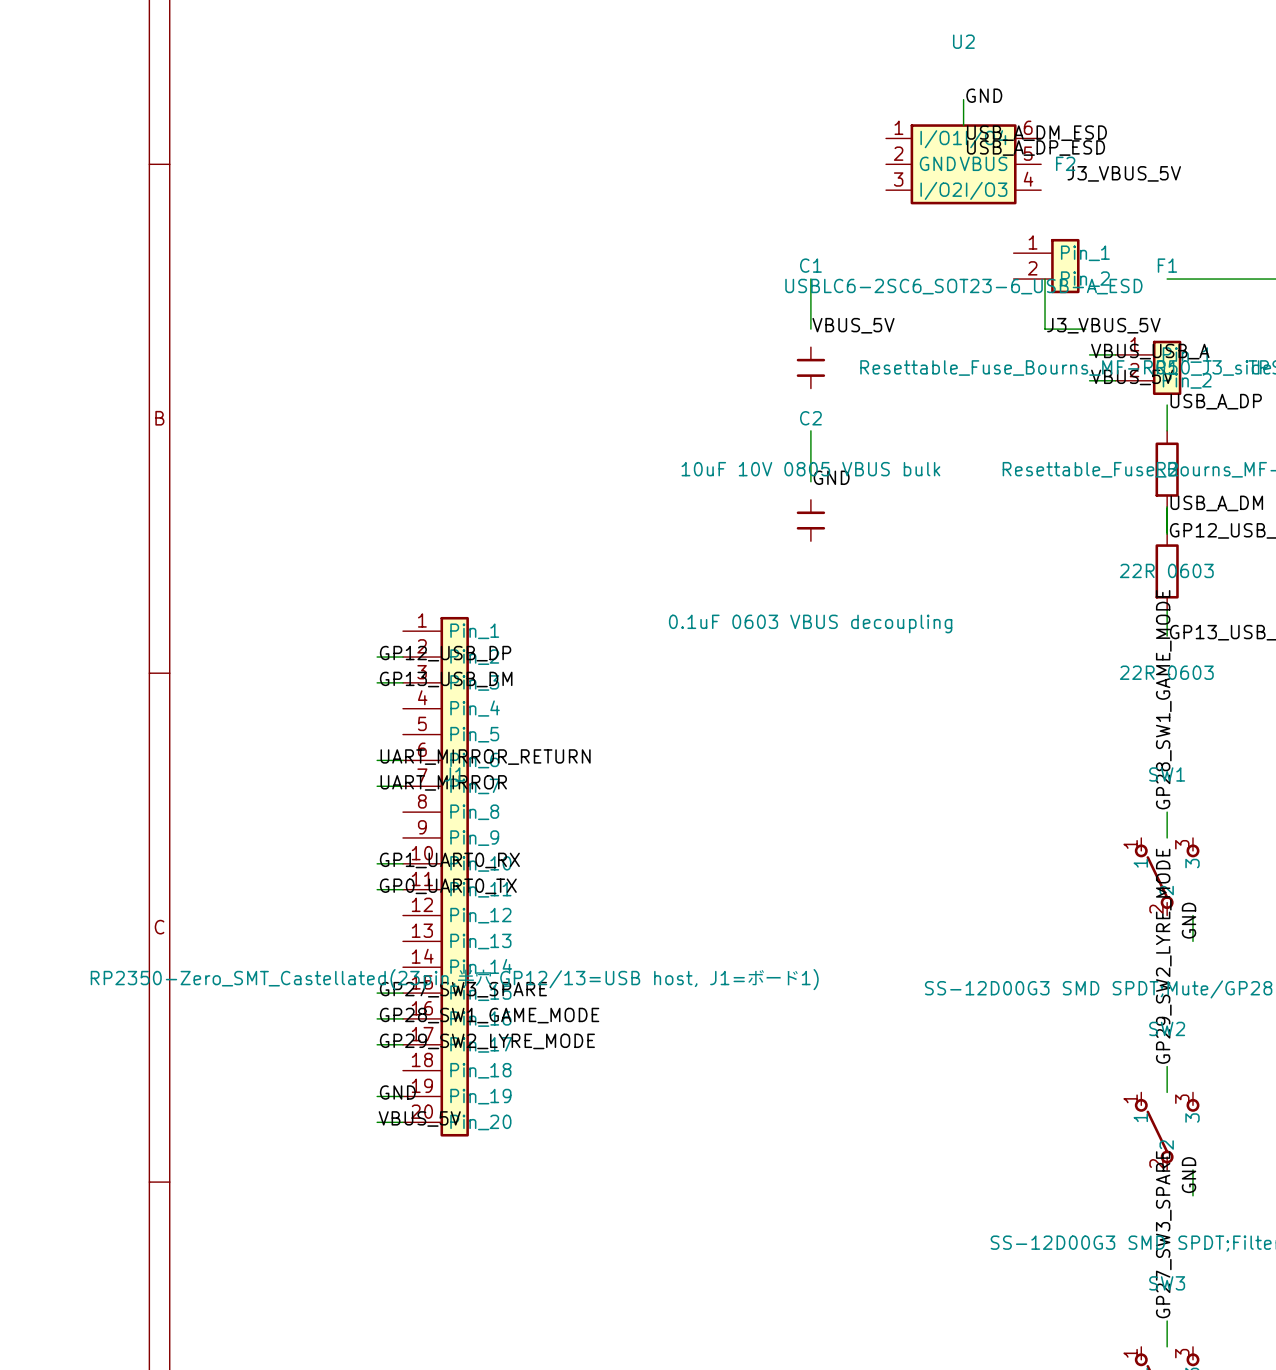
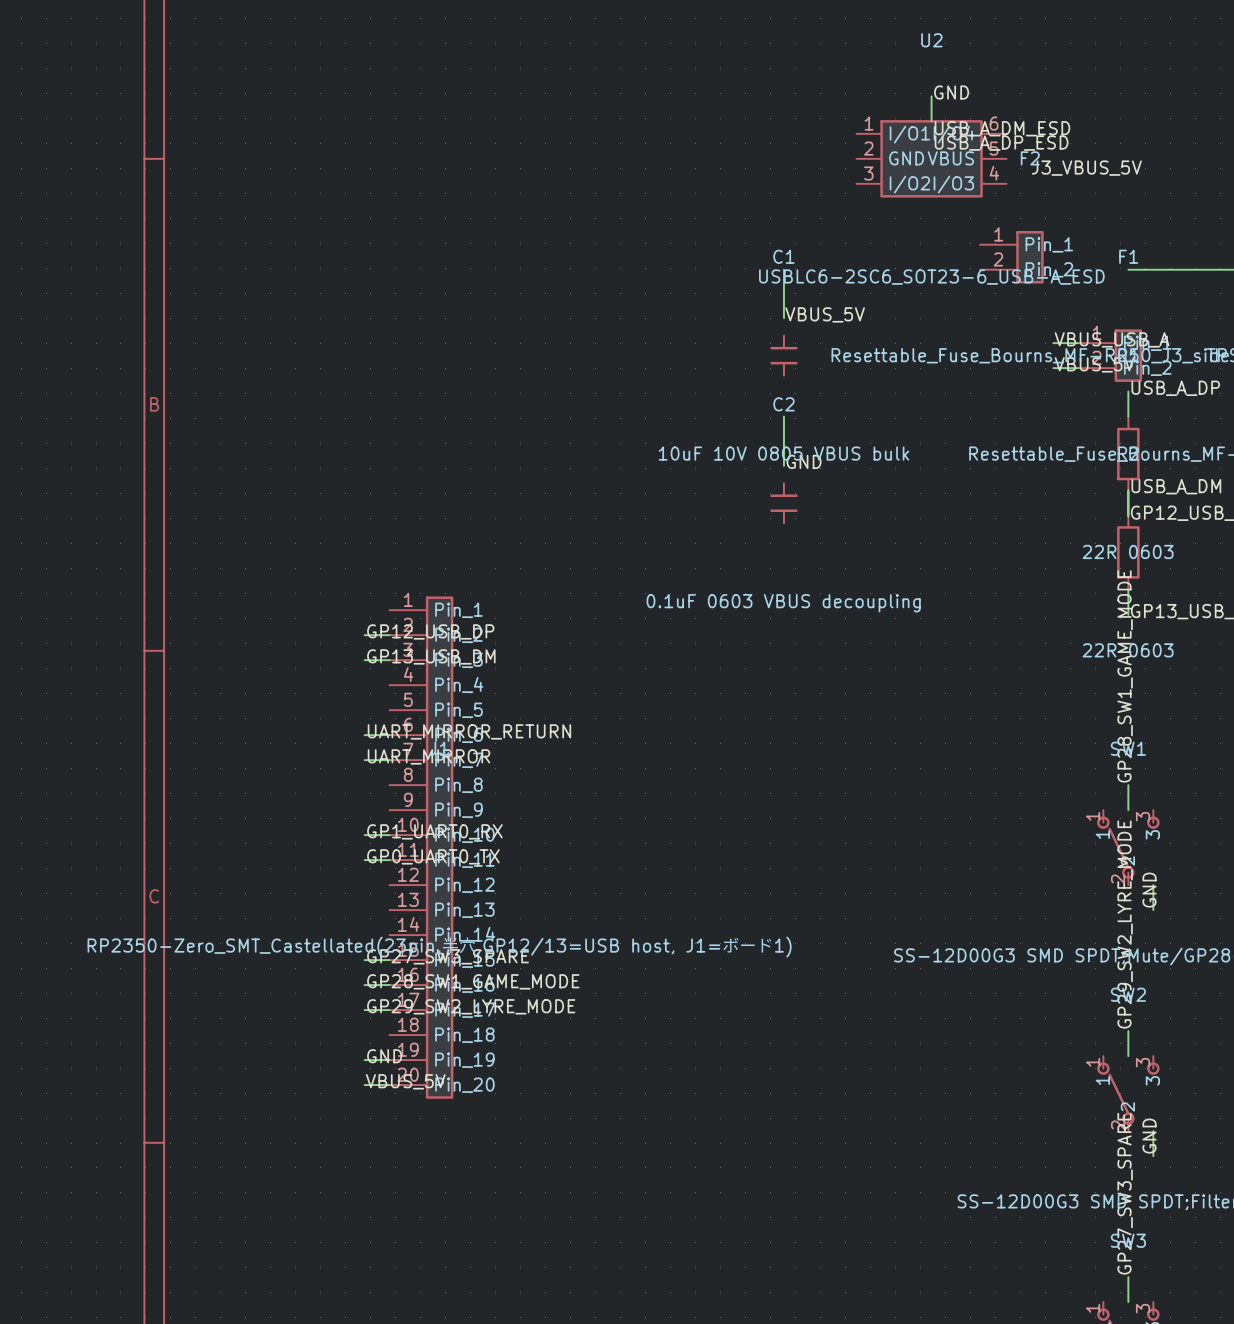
wire: (1045, 279) (1045, 329) (1085, 329) -> none
label: J3_VBUS_5V (1103, 325) -> none

